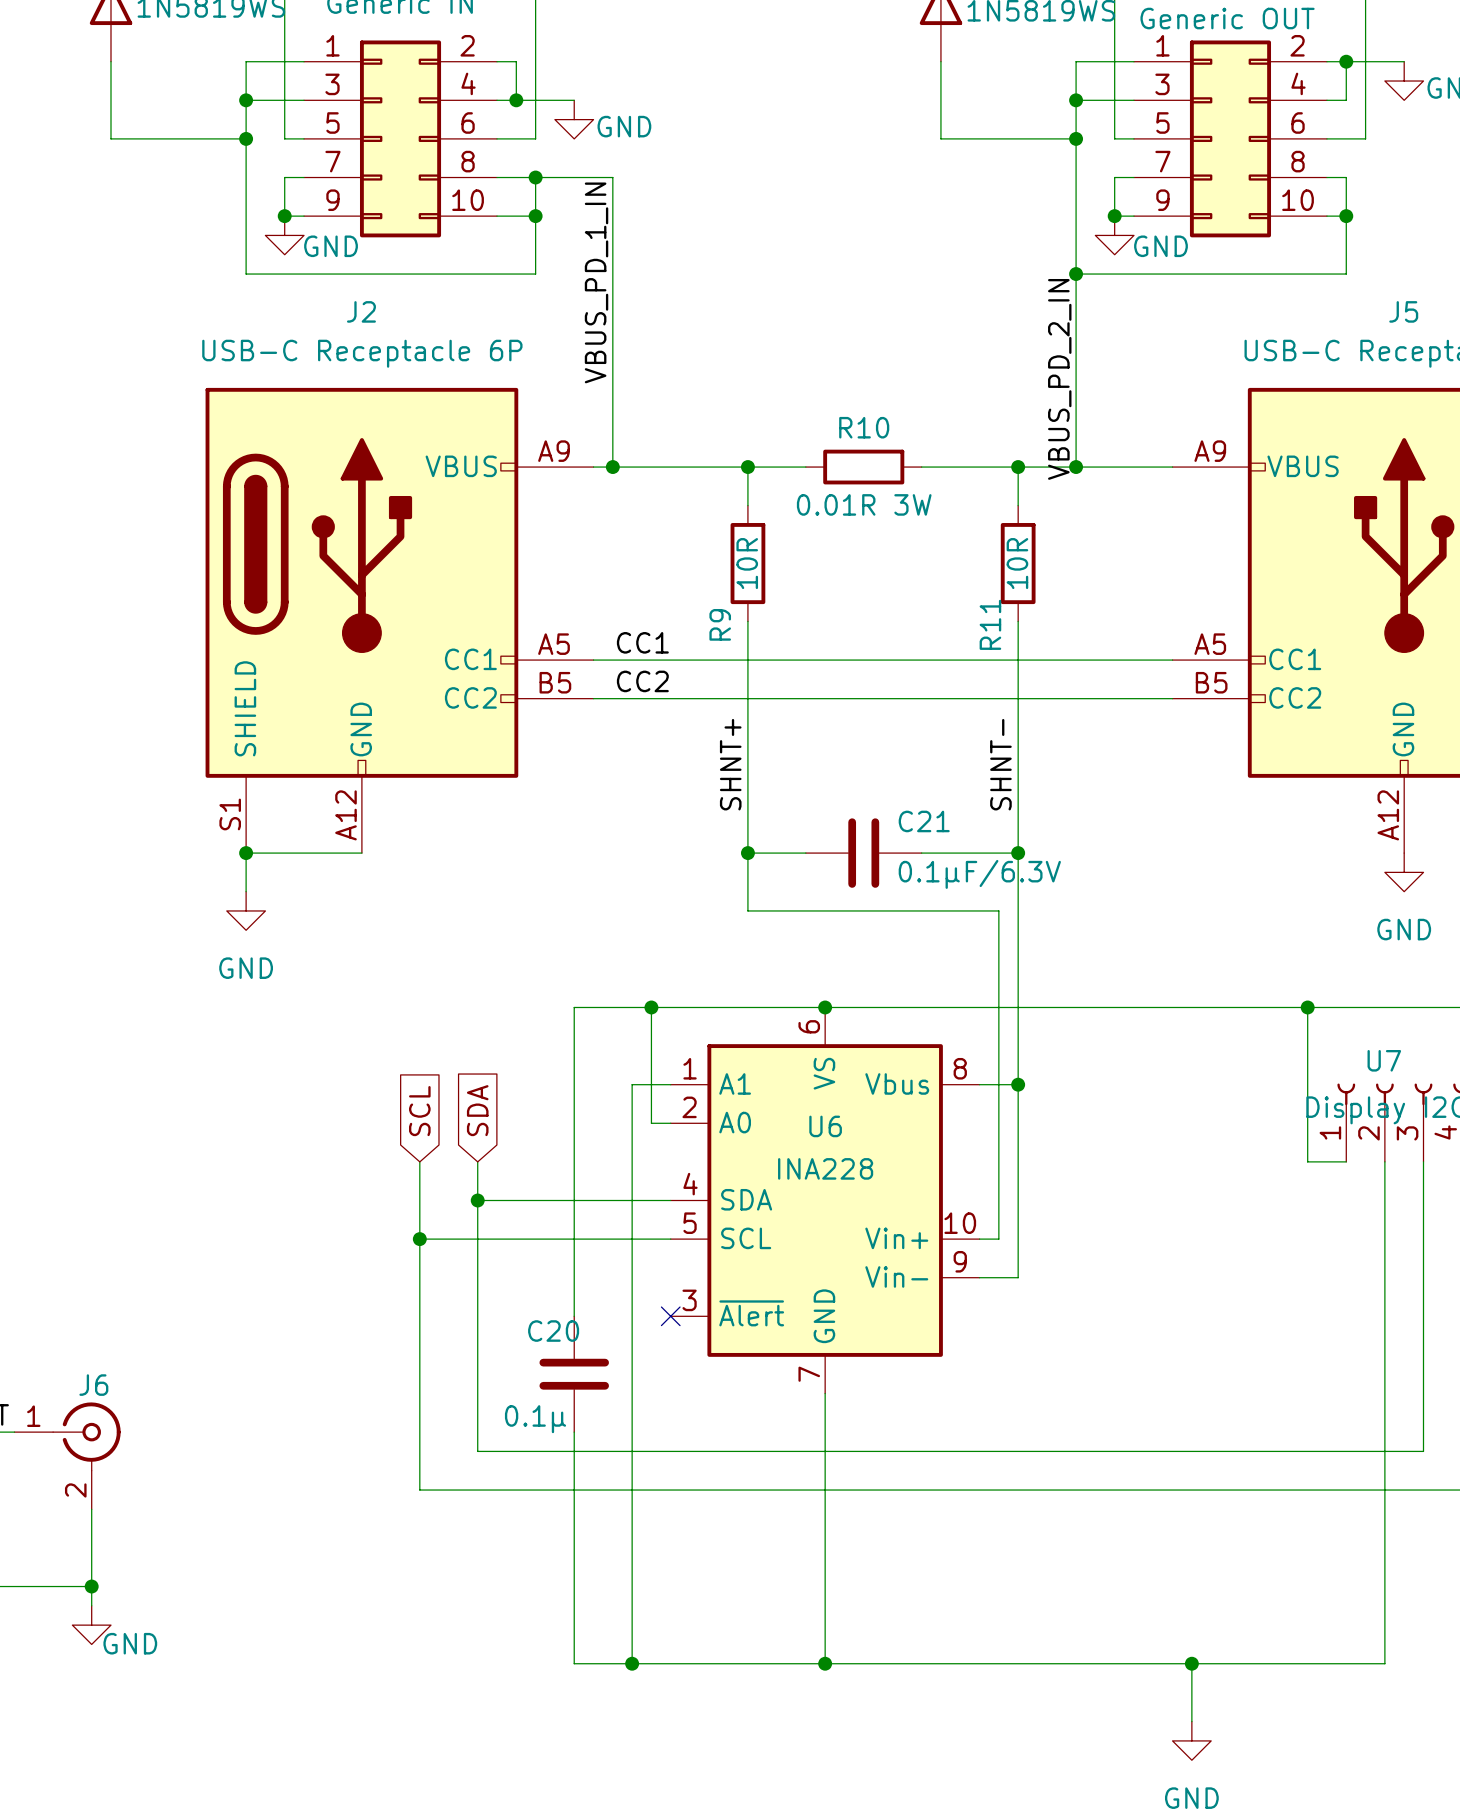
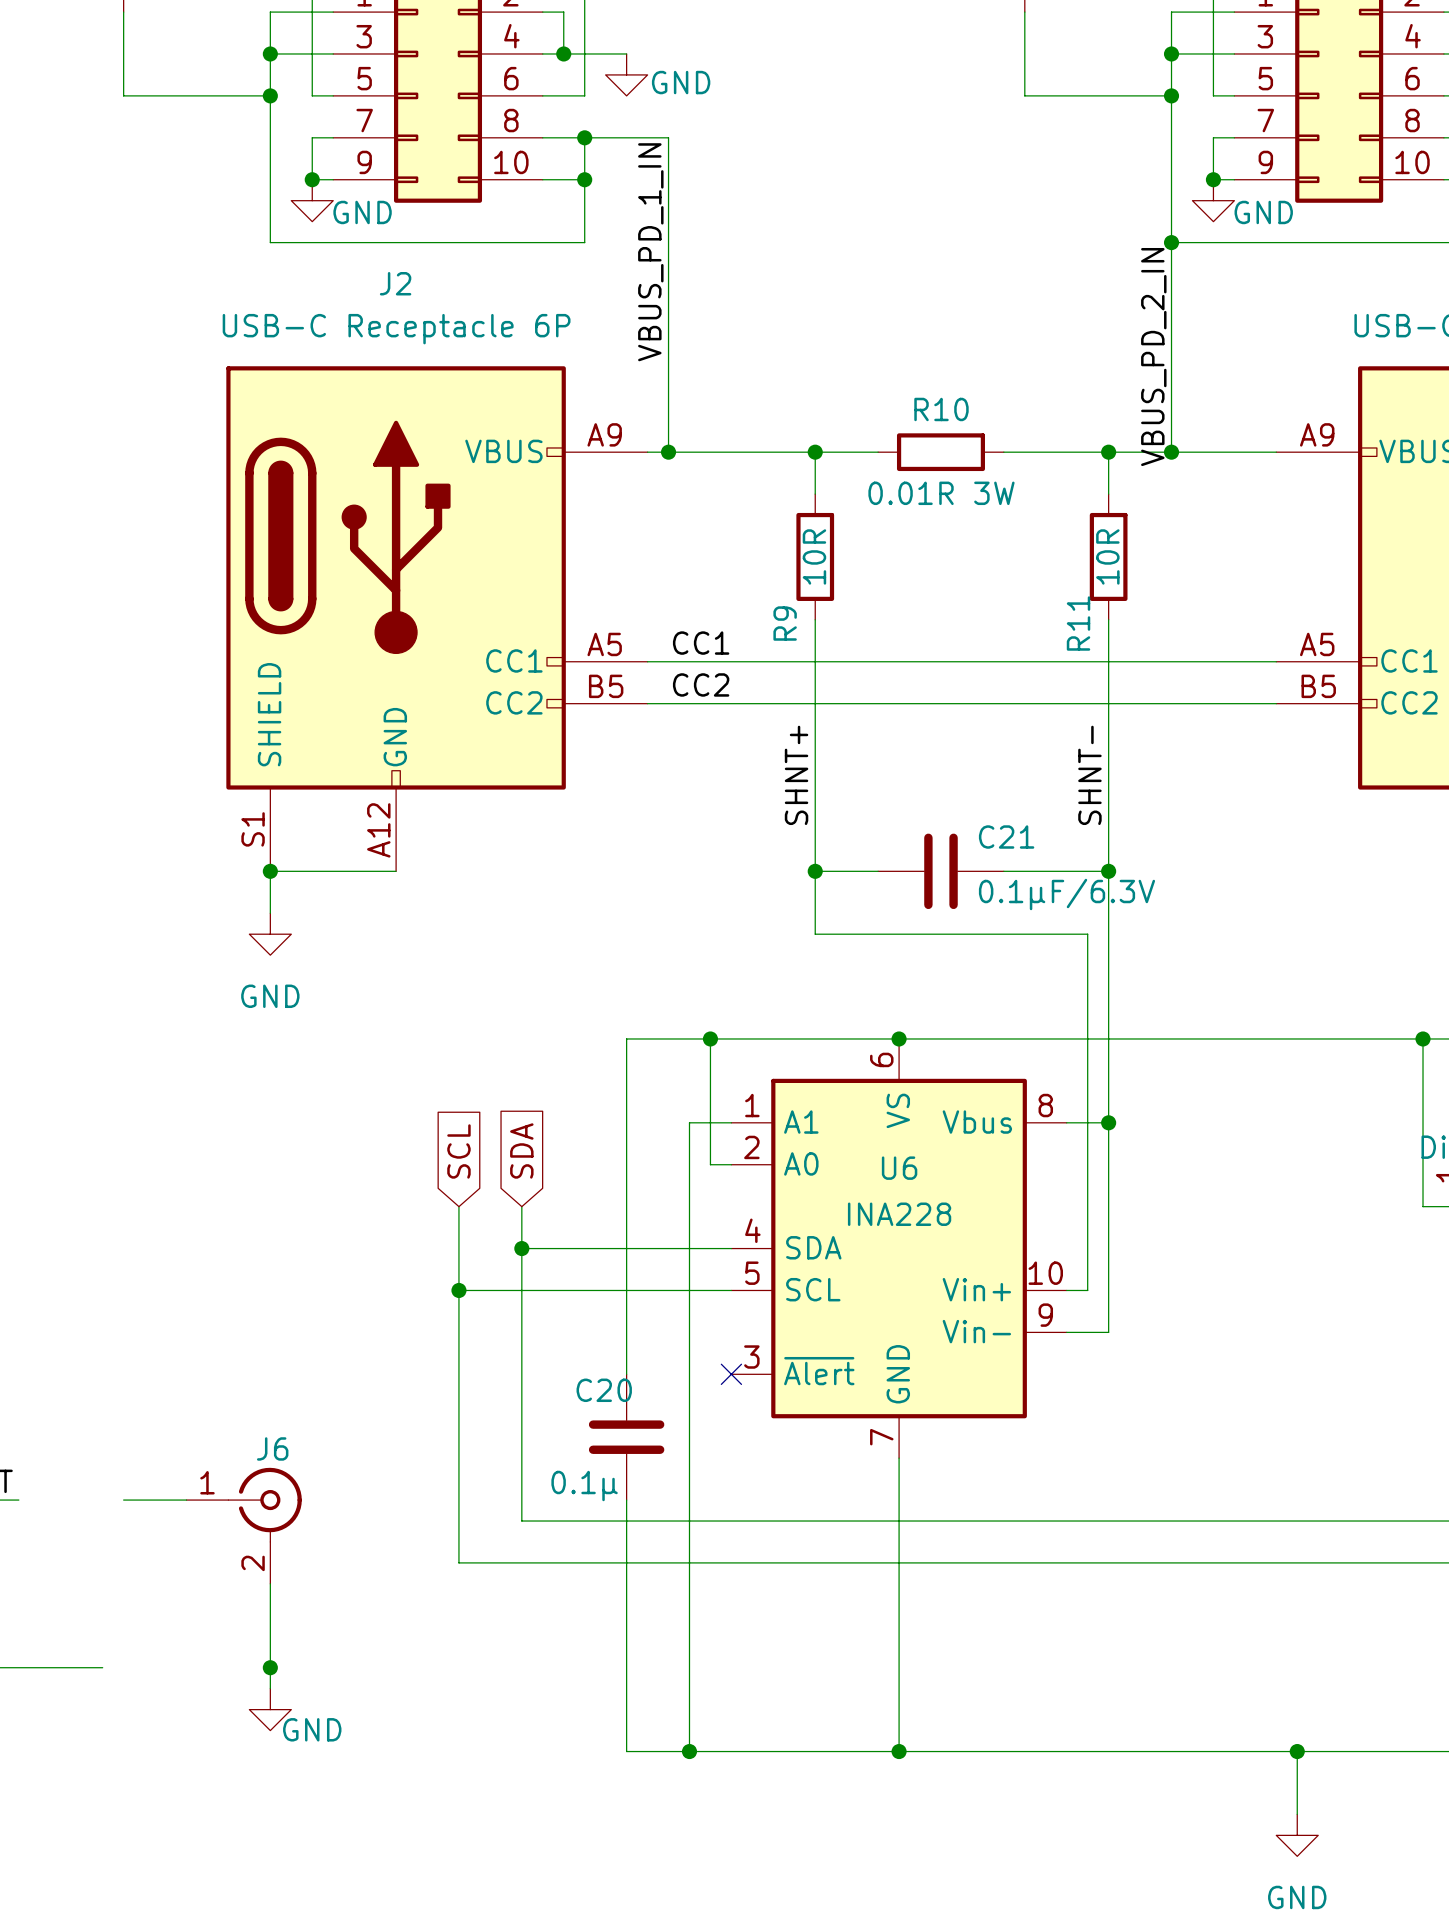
wire: none -> (123, 1500) (186, 1500)
J6 position: (67, 1455) -> (244, 1525)
wire: (91, 1509) (91, 1605) -> (270, 1583) (270, 1688)
junction: (91, 1586) -> none
junction: none -> (270, 1667)
power symbol position: GND (91, 1625) -> GND (270, 1709)

